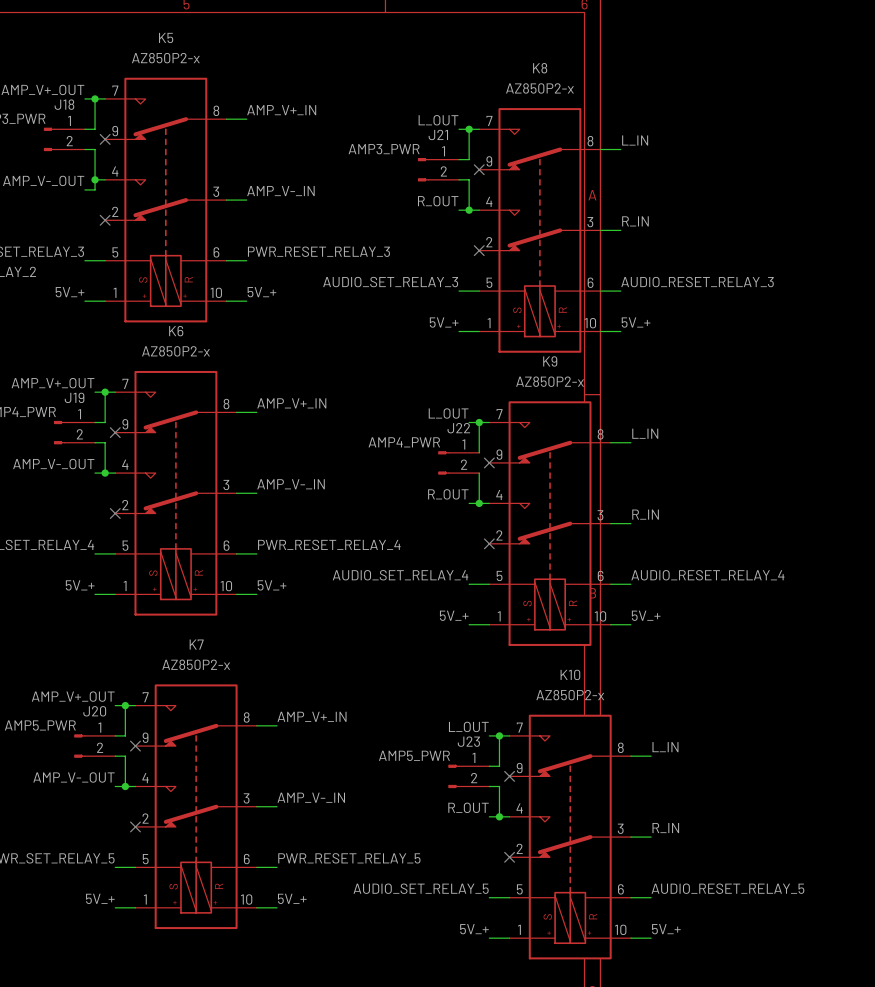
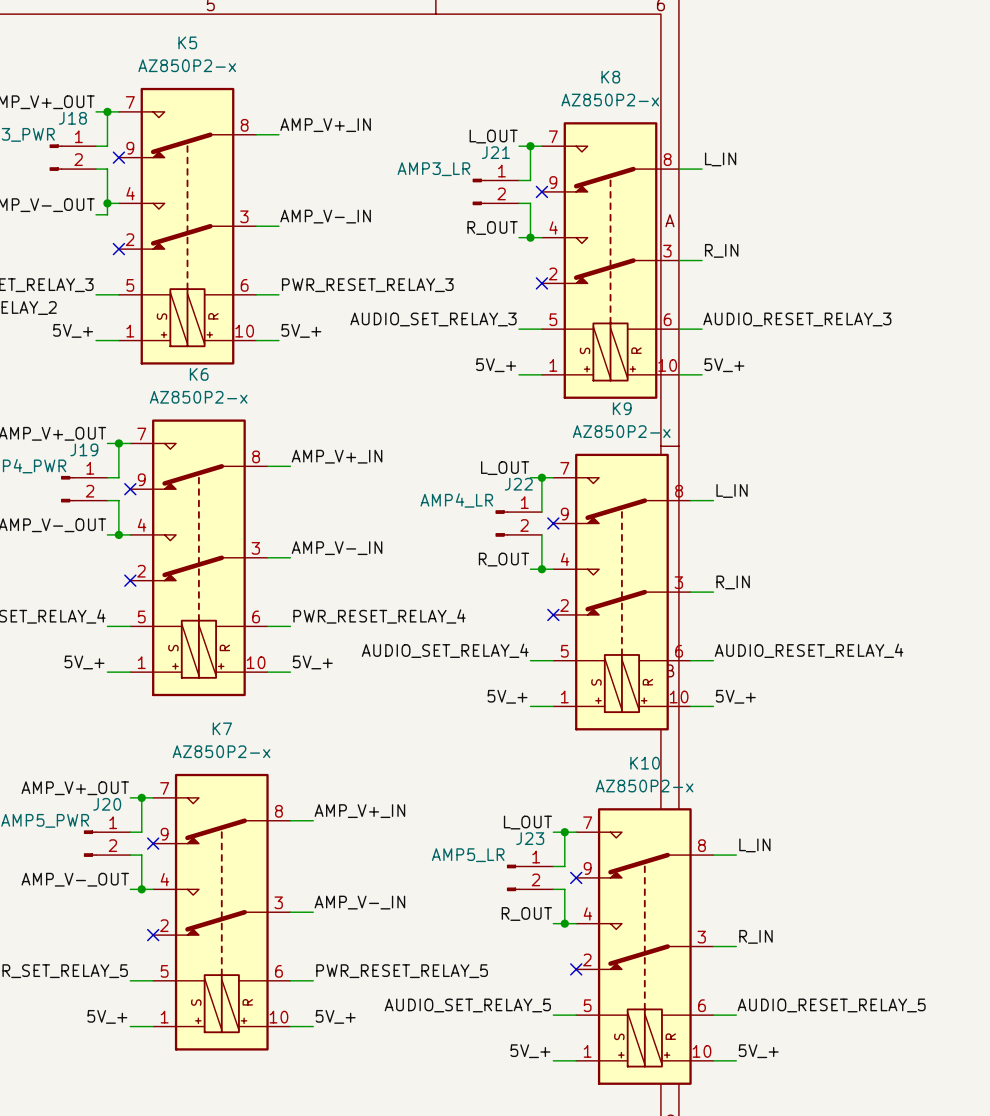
J21 value: AMP3_PWR (384, 149) -> AMP3_LR (433, 169)
J22 value: AMP4_PWR (404, 442) -> AMP4_LR (456, 500)
J23 value: AMP5_PWR (414, 755) -> AMP5_LR (468, 855)

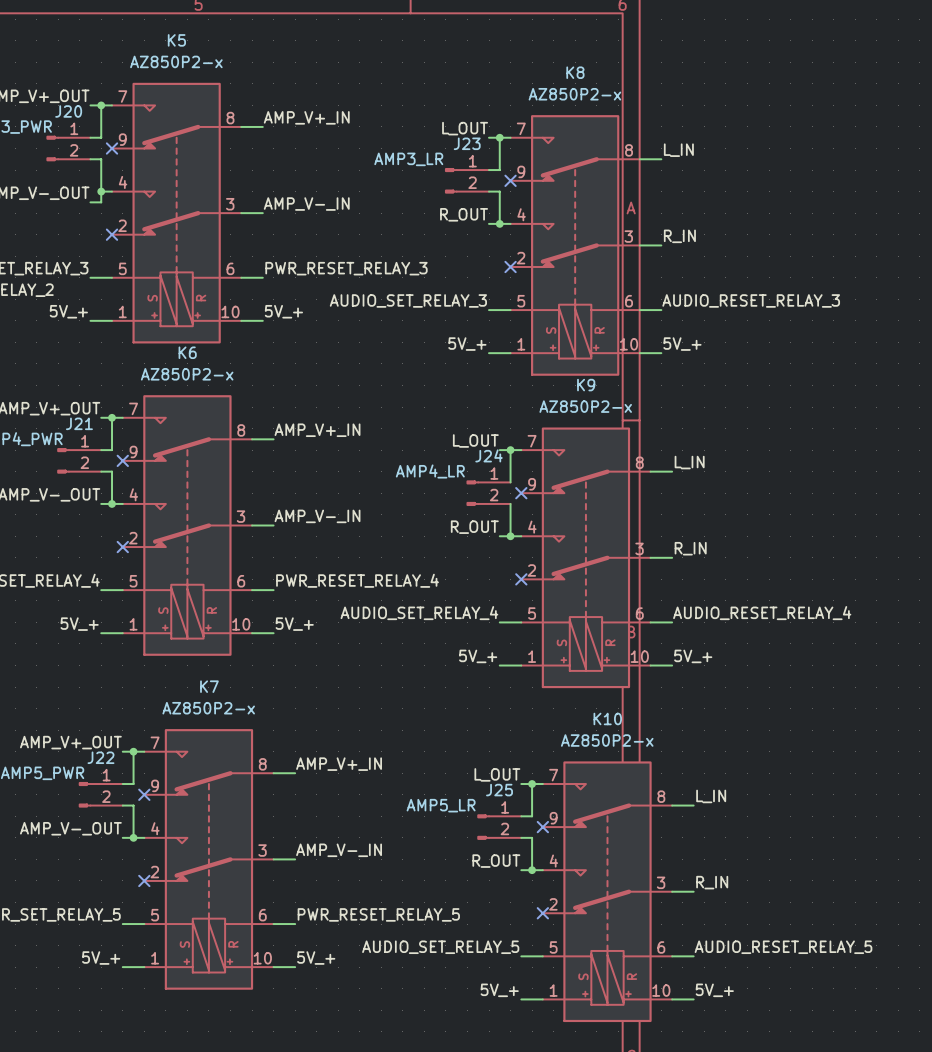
J18 name: J18 (72, 118) -> J20 (68, 111)
J21 name: J21 (495, 152) -> J23 (467, 143)
J19 name: J19 (84, 449) -> J21 (79, 423)
J22 name: J22 (518, 484) -> J24 (489, 455)
J20 name: J20 (107, 804) -> J22 (100, 757)
J23 name: J23 (530, 838) -> J25 (499, 790)

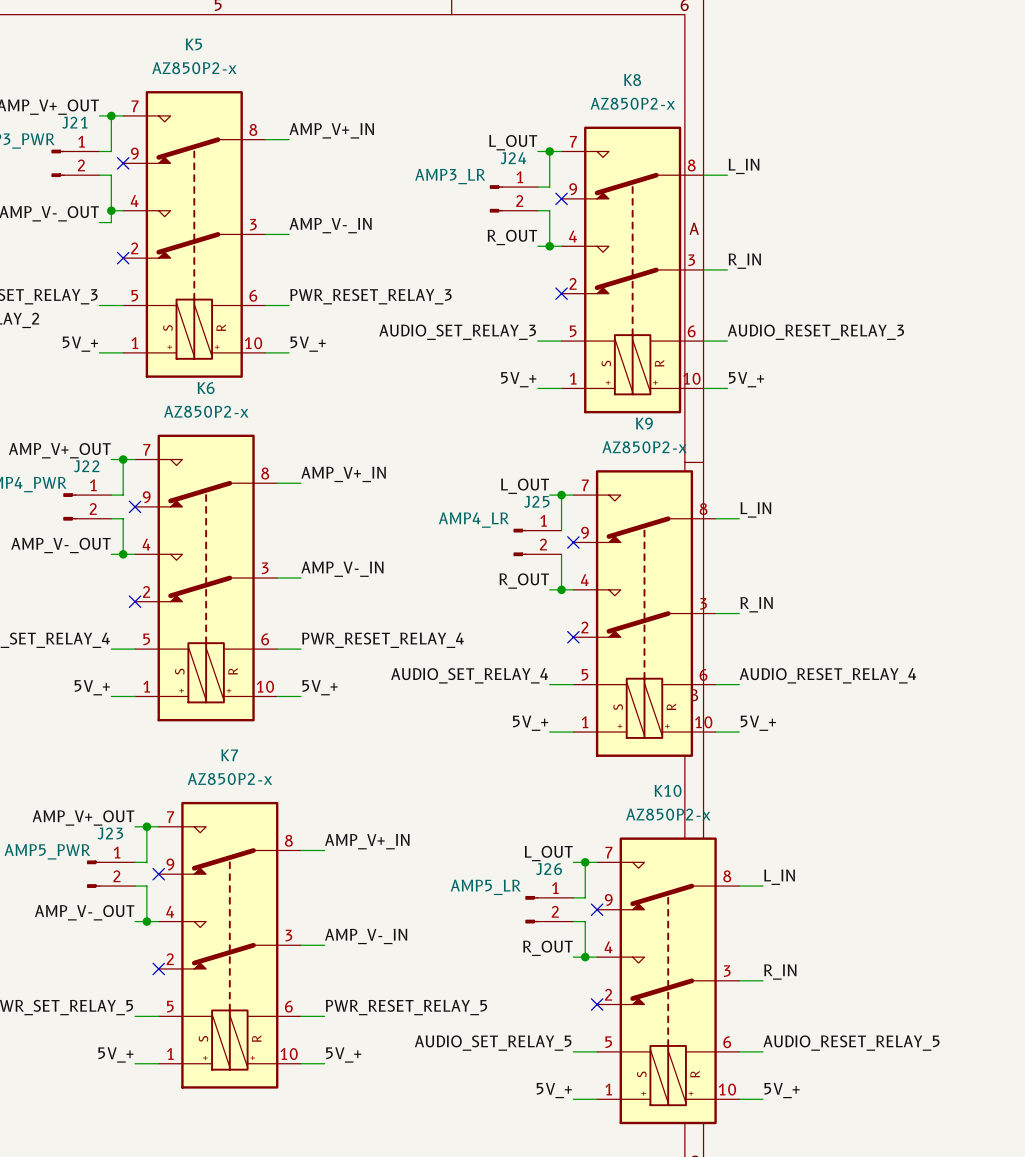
J20 name: J20 (68, 111) -> J21 (74, 122)
J23 name: J23 (467, 143) -> J24 (513, 158)
J21 name: J21 (79, 423) -> J22 (86, 466)
J24 name: J24 (489, 455) -> J25 (536, 501)
J22 name: J22 (100, 757) -> J23 (110, 833)
J25 name: J25 (499, 790) -> J26 (549, 869)

